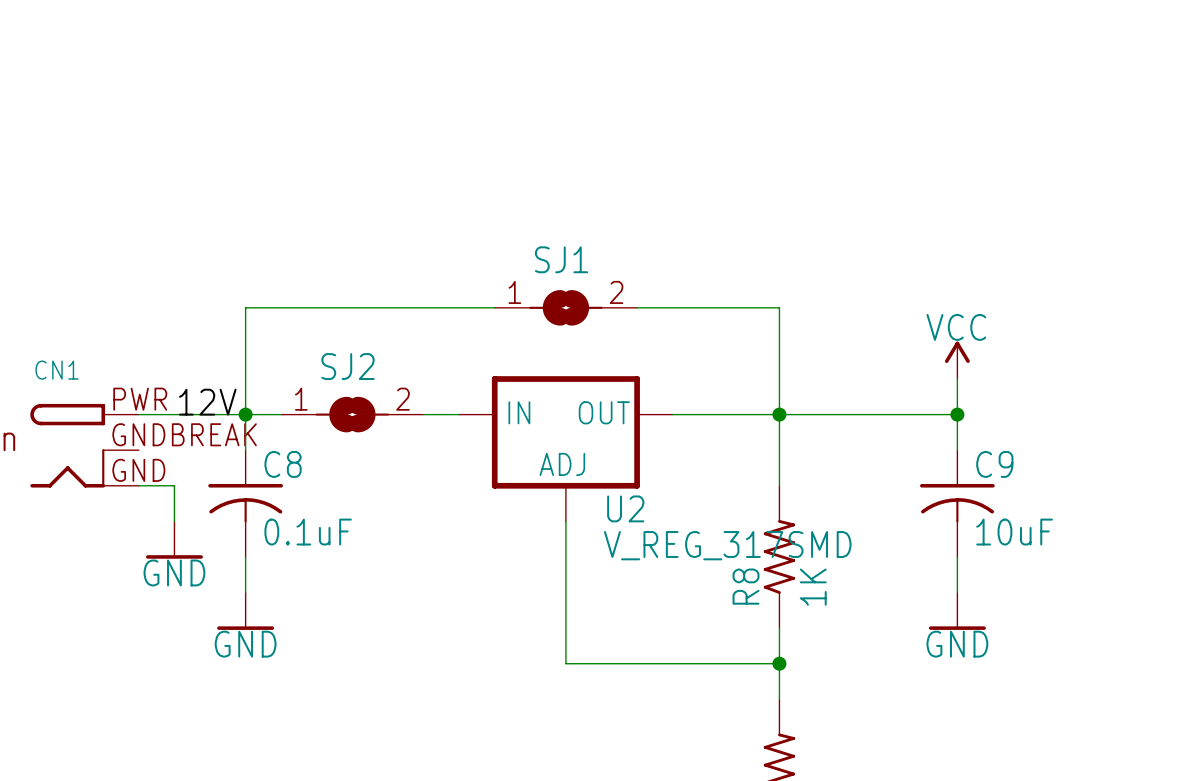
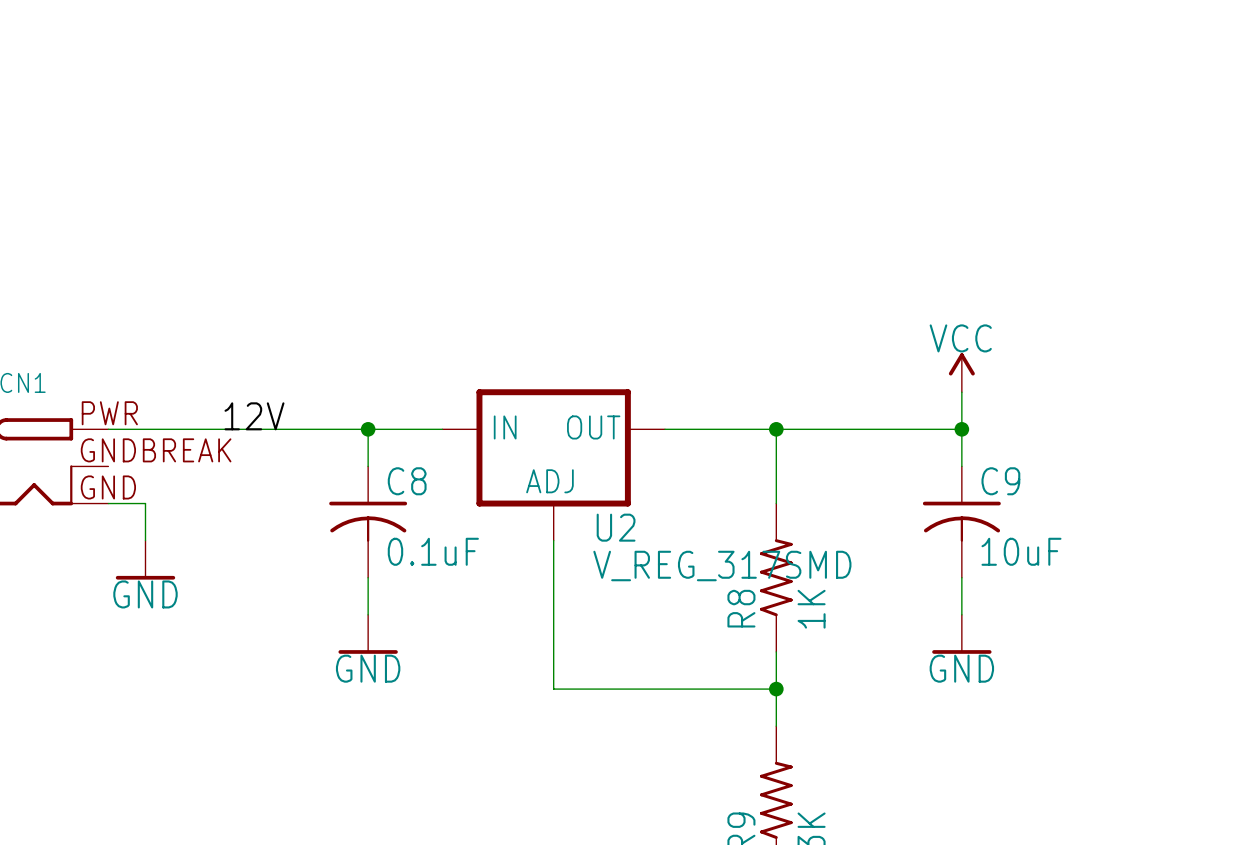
wire: (494, 307) (245, 307) (245, 450) -> none
SJ1: (565, 307) -> none
wire: (637, 307) (779, 307) (779, 414) -> none
label position: 12V (207, 402) -> 12V (254, 416)
junction: (245, 414) -> none
SJ2: (352, 414) -> none
wire: none -> (368, 429) (368, 466)
junction: none -> (368, 429)
C8 position: (245, 503) -> (368, 522)
wire: (245, 556) (245, 592) -> (368, 577) (368, 614)
power symbol position: GND (245, 611) -> GND (368, 634)

